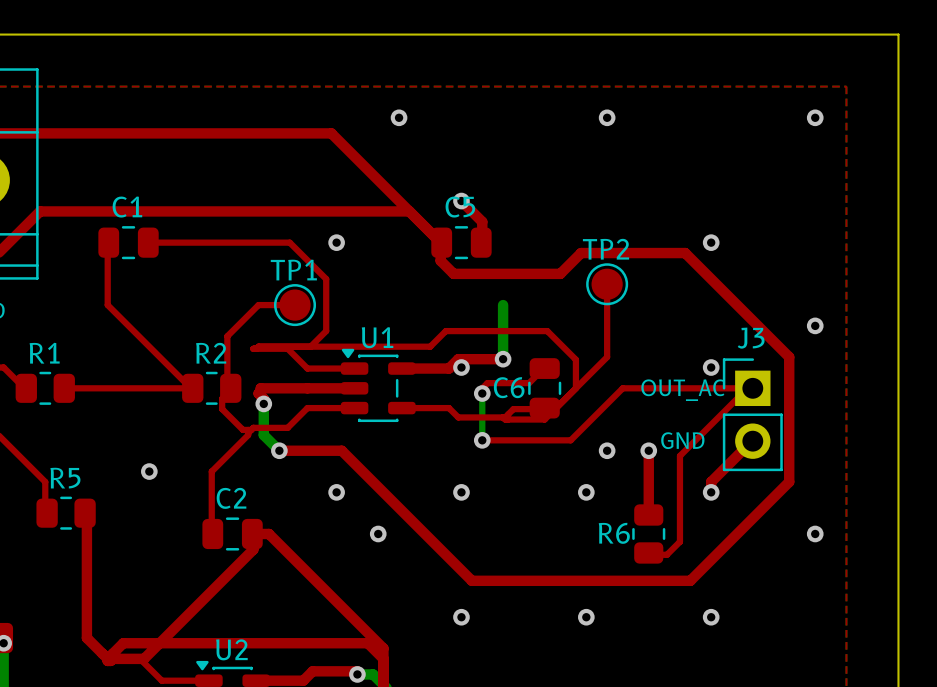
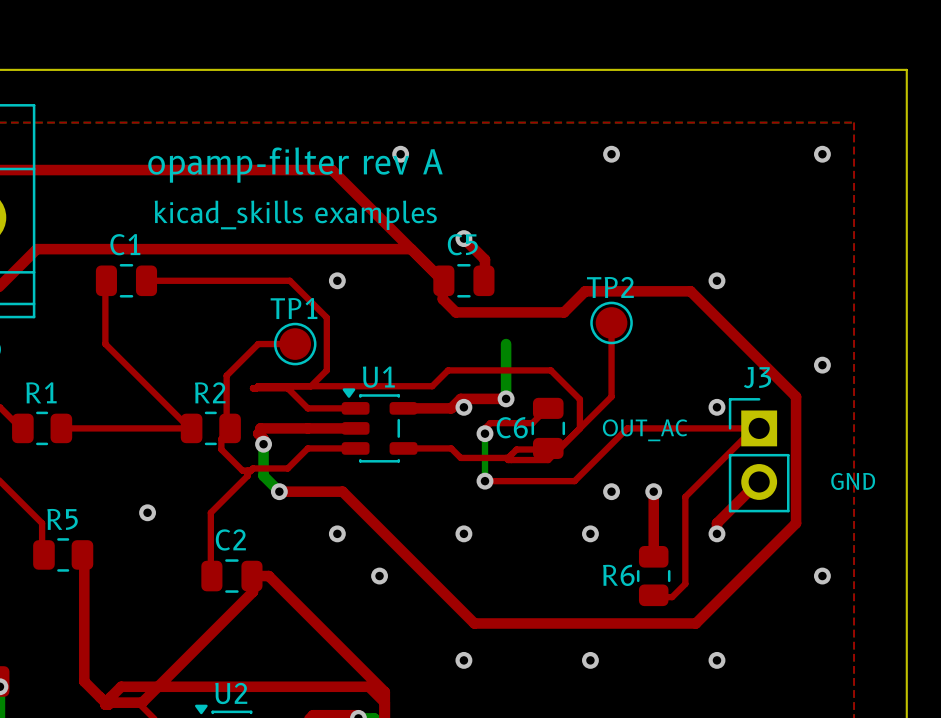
text: none -> opamp-filter rev A (295, 165)
text: none -> kicad_skills examples (295, 215)
text position: OUT_AC (682, 390) -> OUT_AC (645, 430)
text position: GND (682, 440) -> GND (853, 481)

